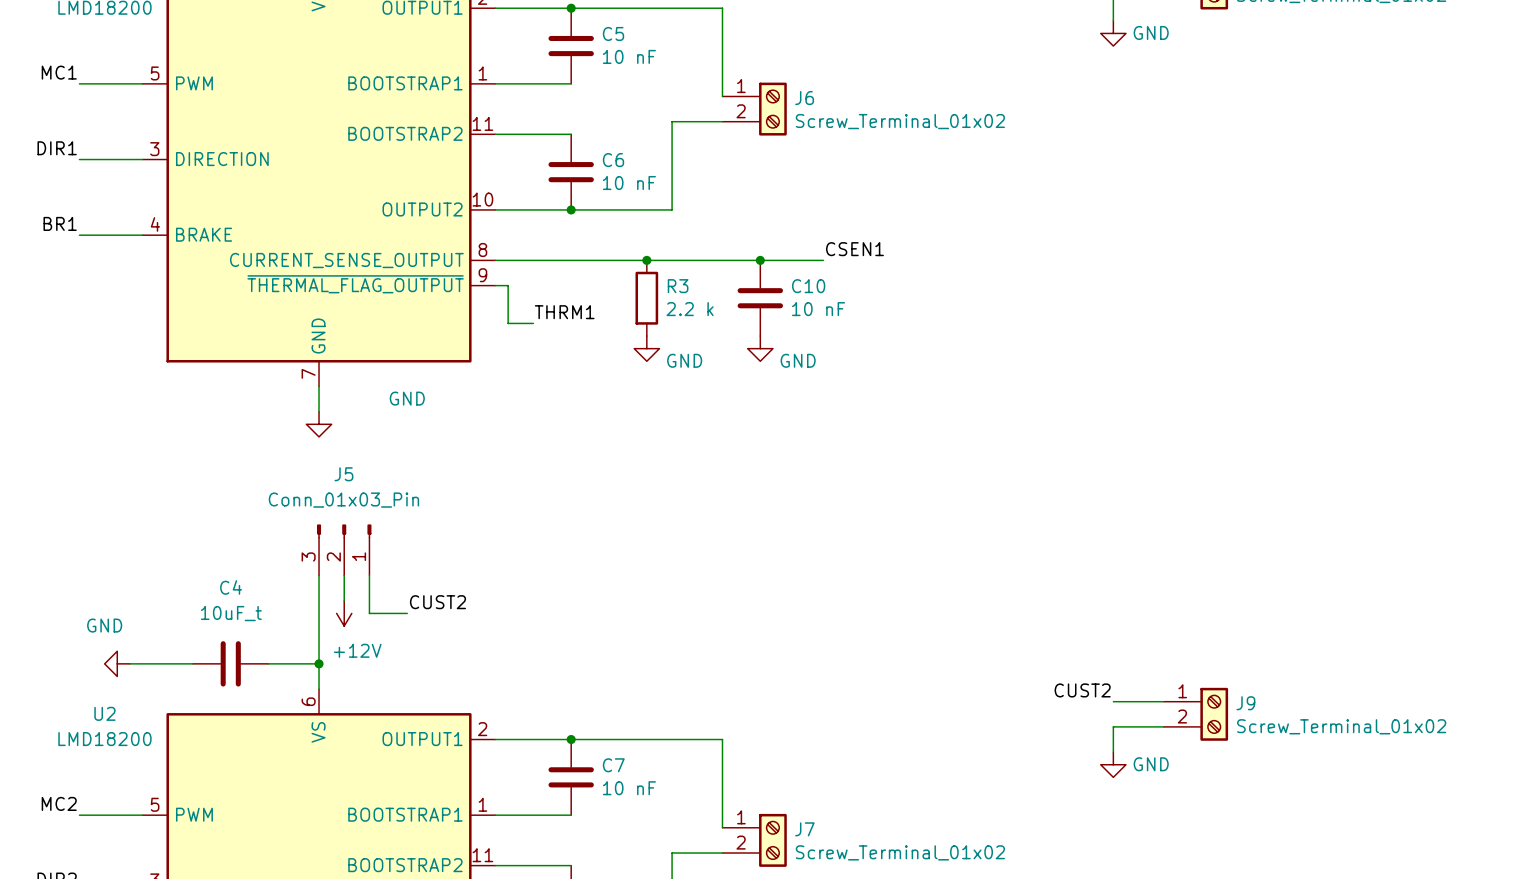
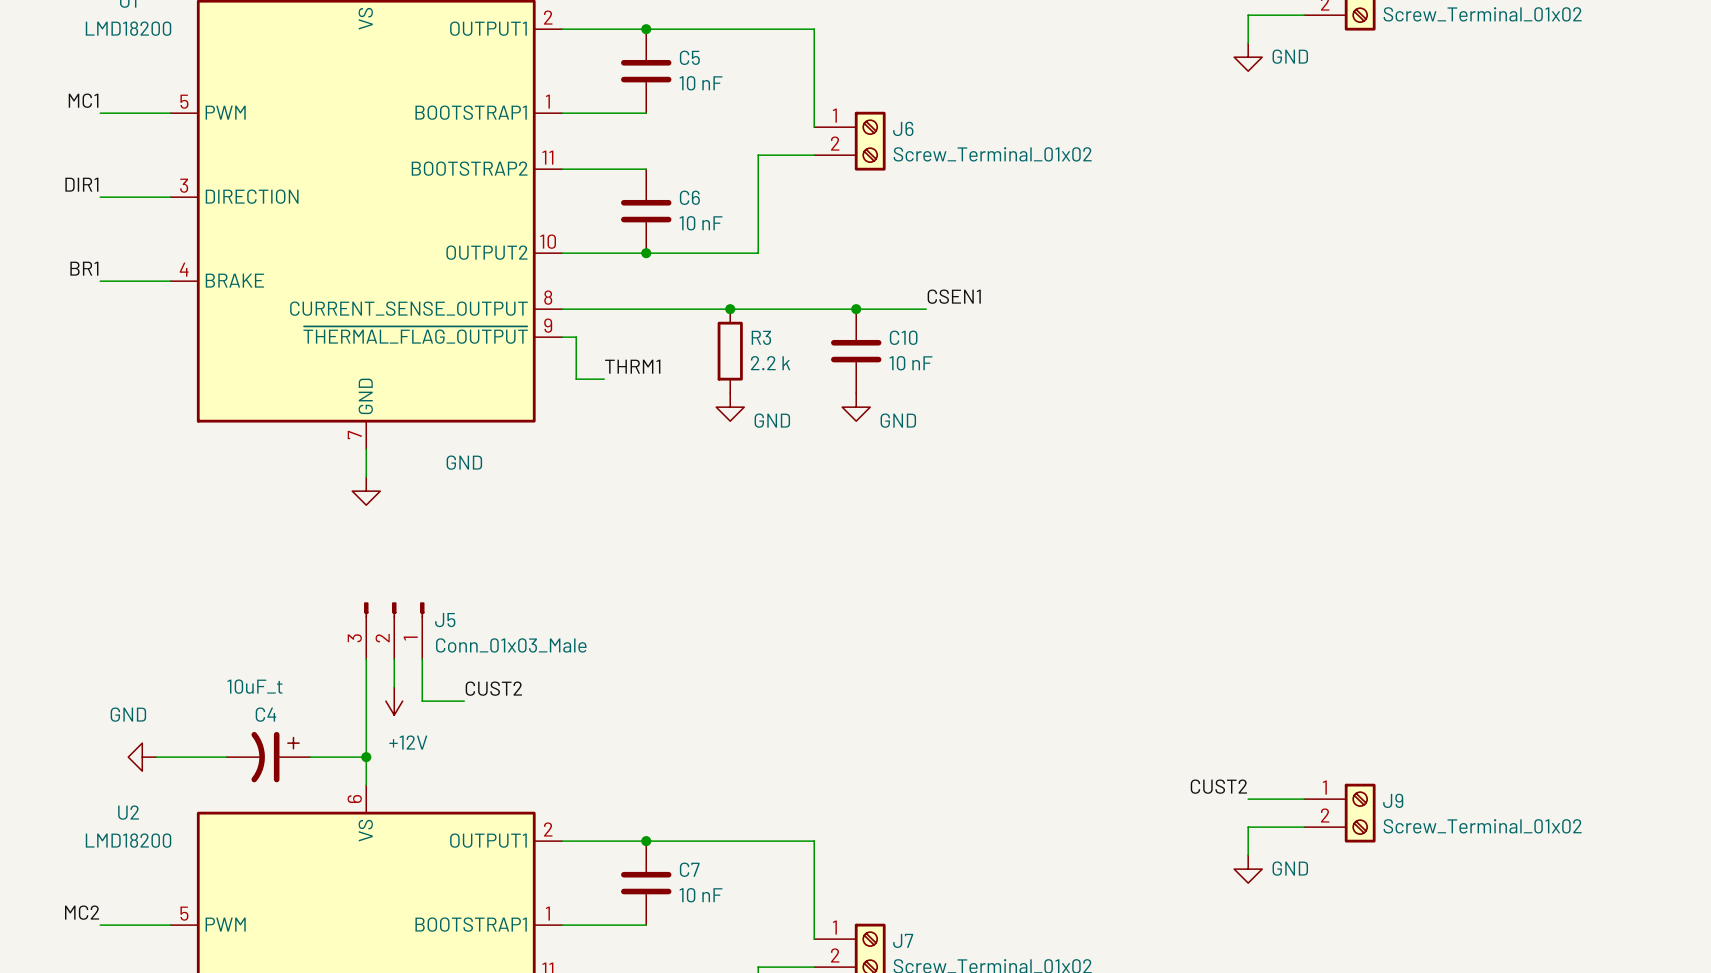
J5 name position: J5 (343, 474) -> J5 (445, 620)
J5 value: Conn_01x03_Pin (343, 500) -> Conn_01x03_Male (511, 645)
C4 name position: C4 (231, 587) -> C4 (265, 714)
C4 symbol: [192, 641, 269, 687] -> [226, 731, 311, 783]

